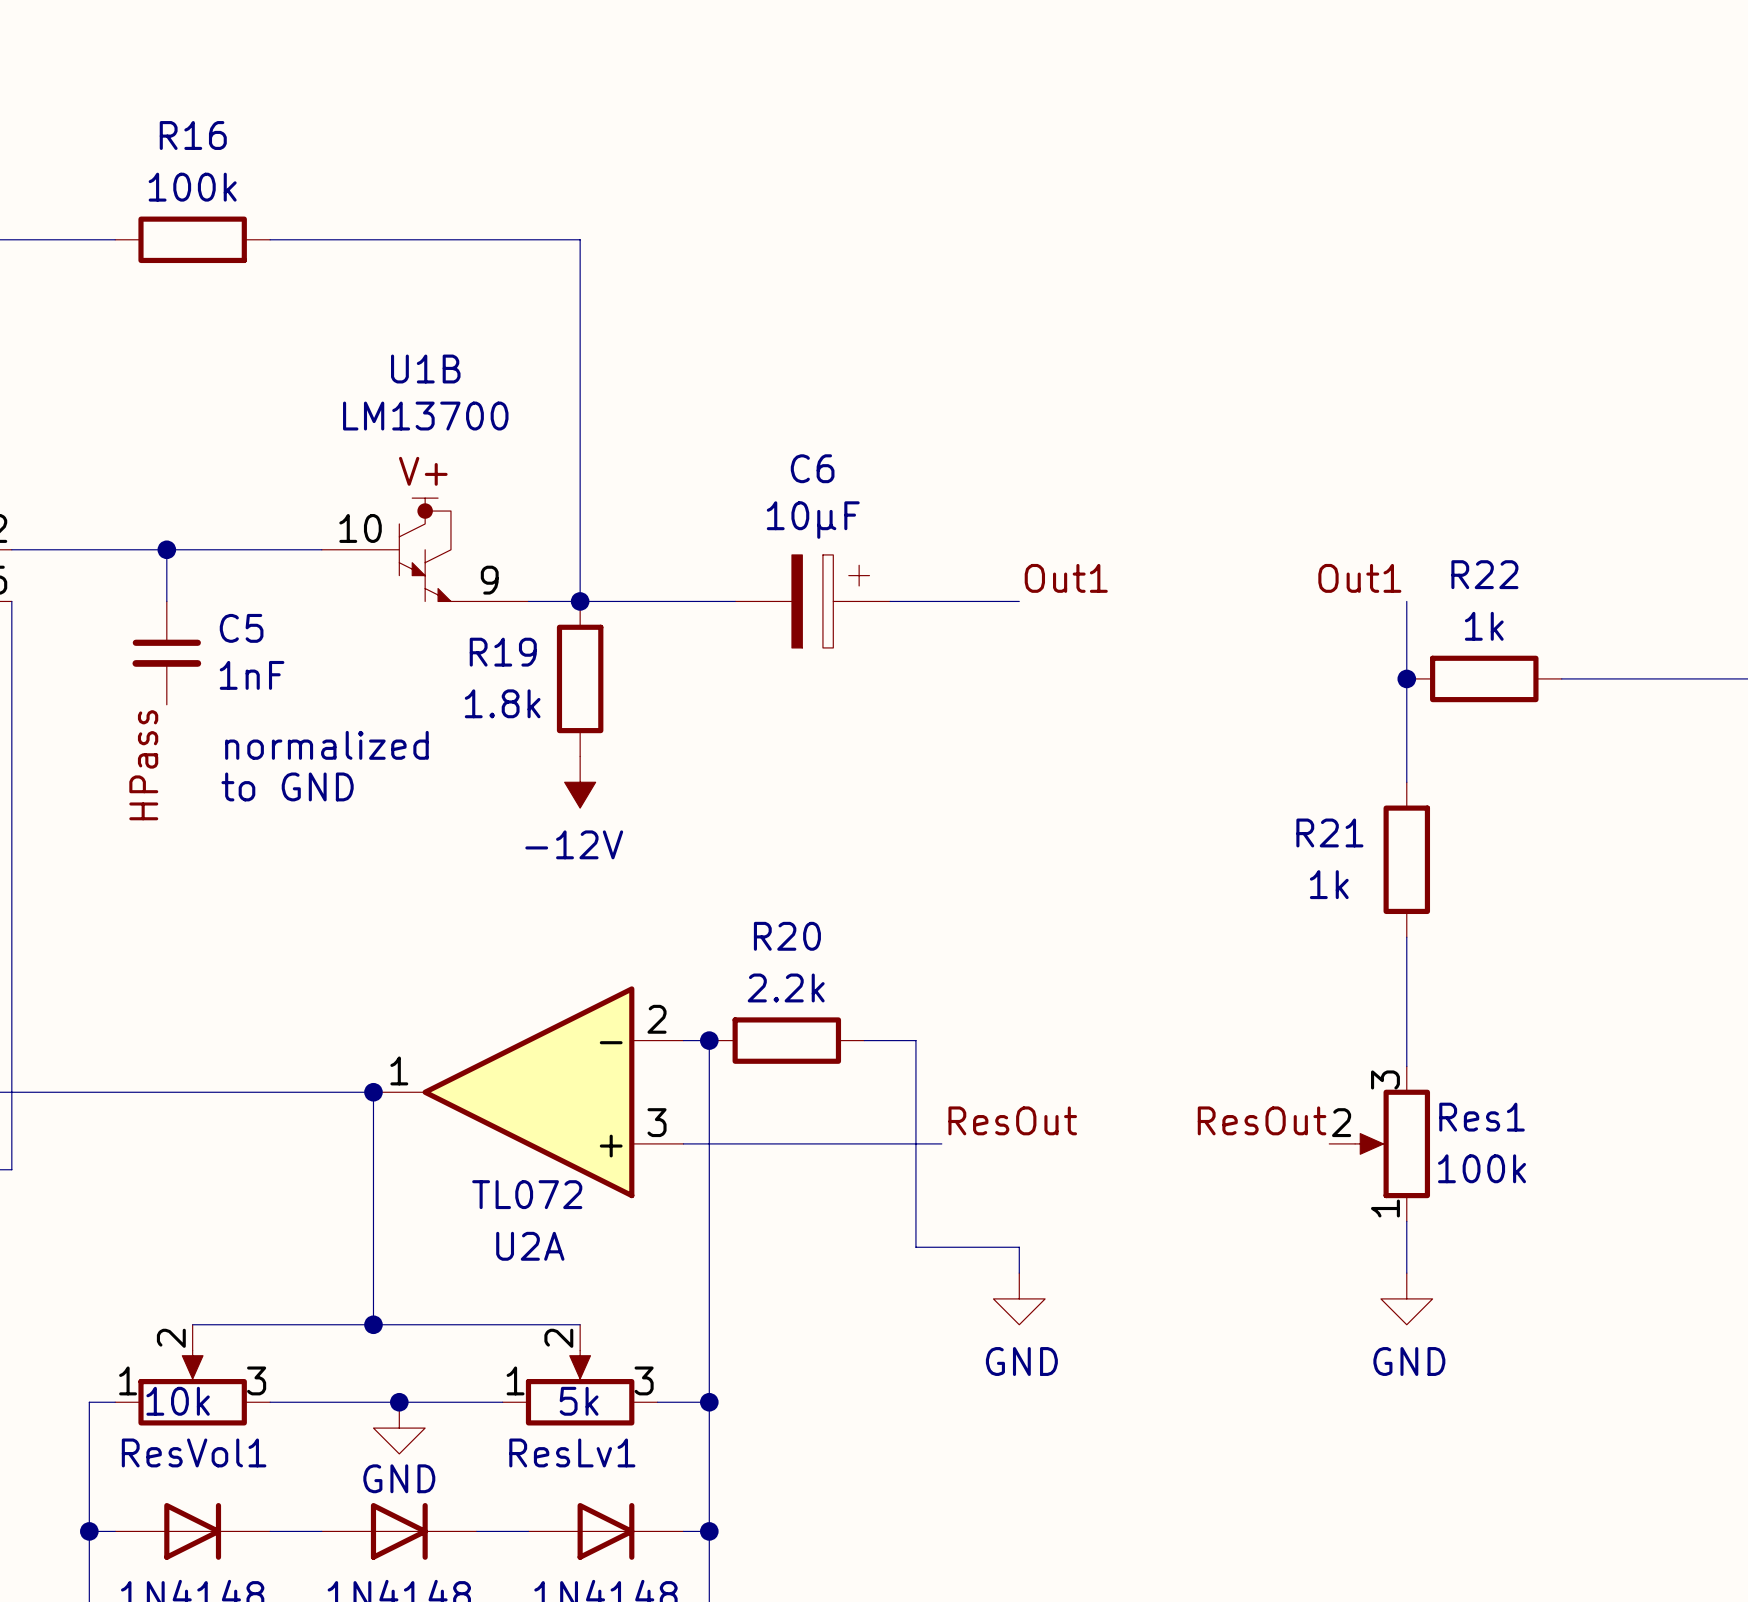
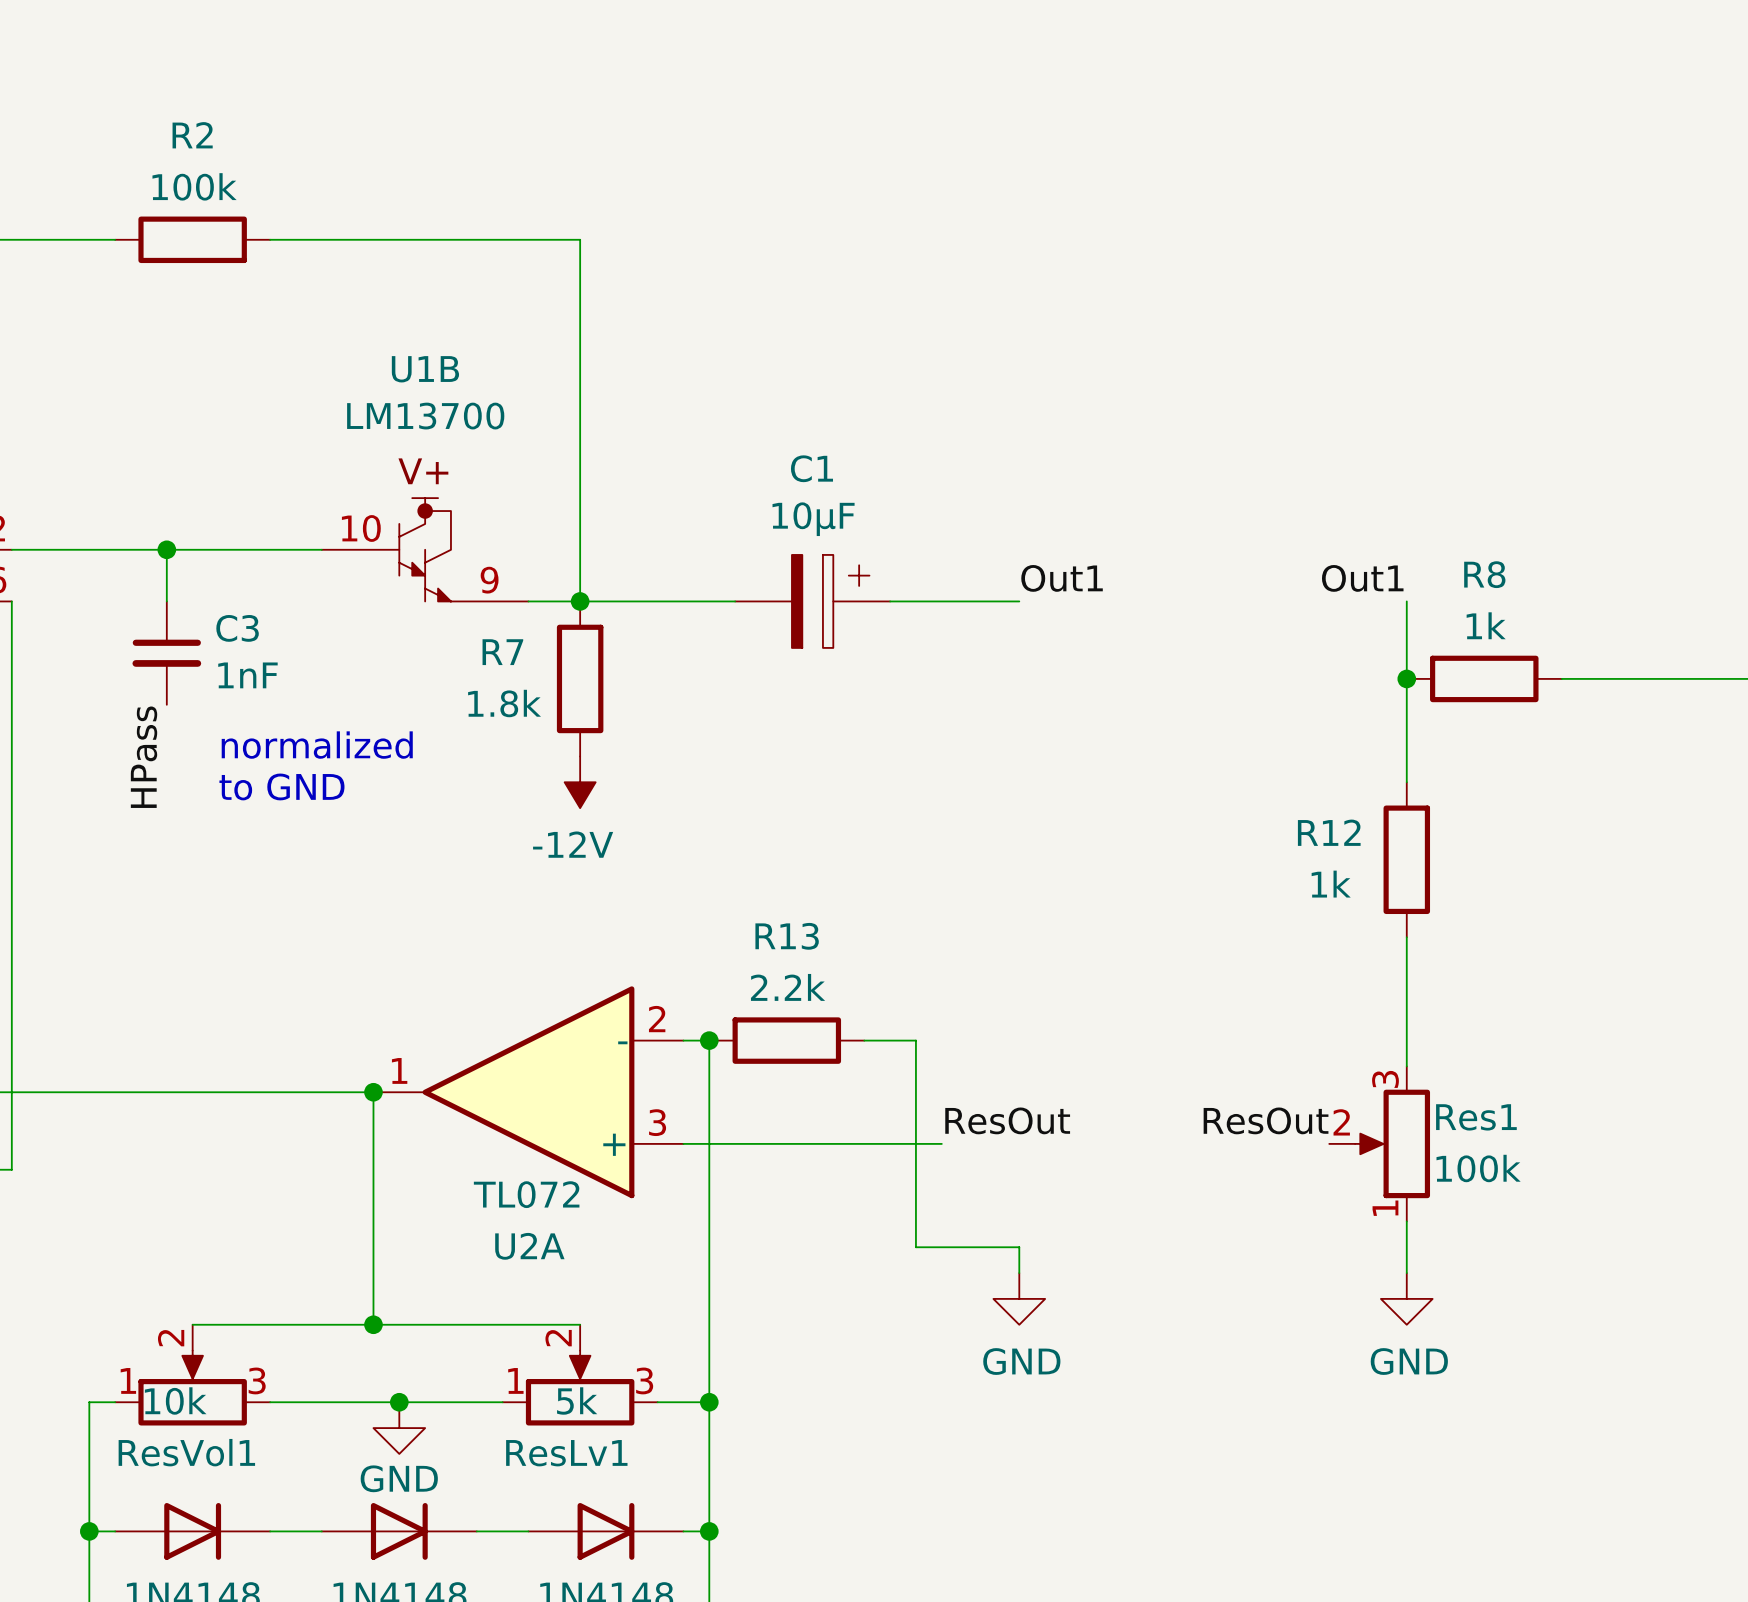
R16 name: R16 (193, 135) -> R2 (192, 135)
C6 name: C6 (812, 468) -> C1 (811, 468)
R22 name: R22 (1484, 574) -> R8 (1484, 574)
C5 name: C5 (241, 628) -> C3 (237, 628)
R19 name: R19 (503, 652) -> R7 (502, 652)
R21 name: R21 (1329, 832) -> R12 (1329, 832)
R20 name: R20 (787, 936) -> R13 (787, 936)

